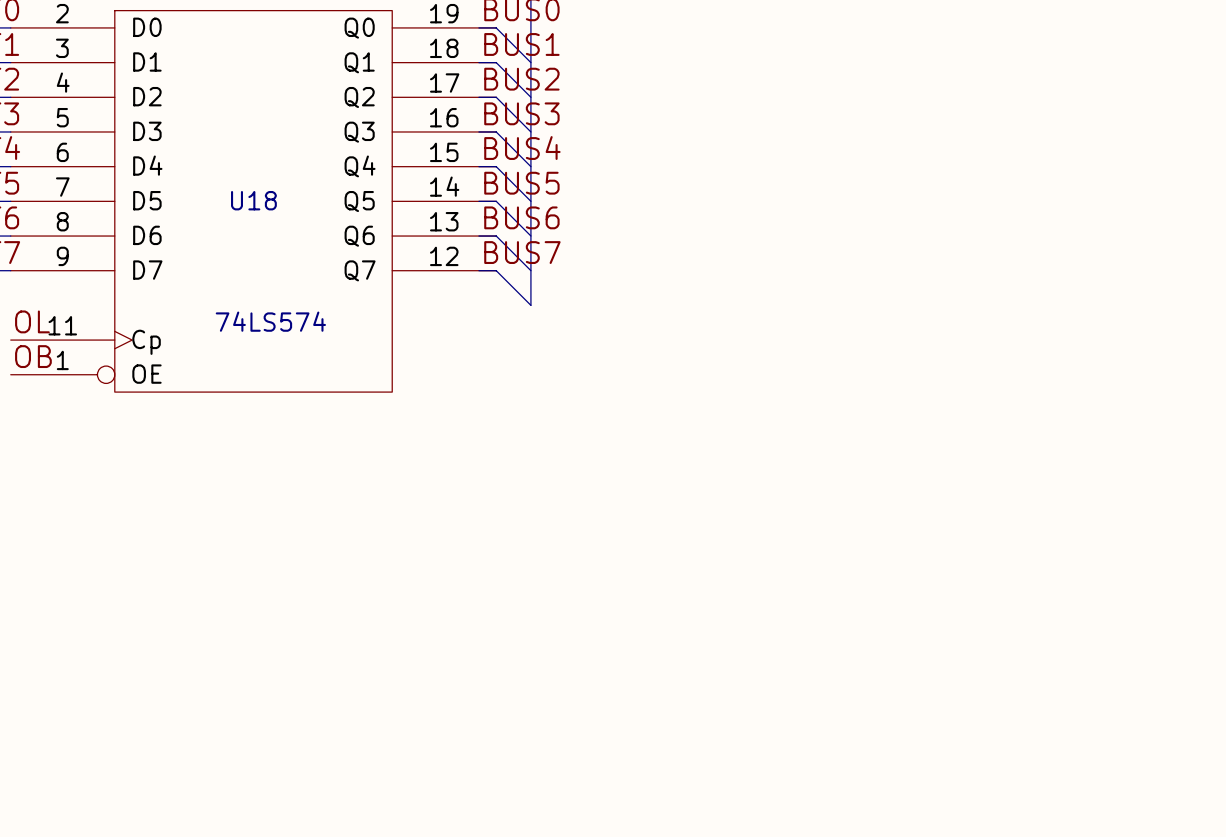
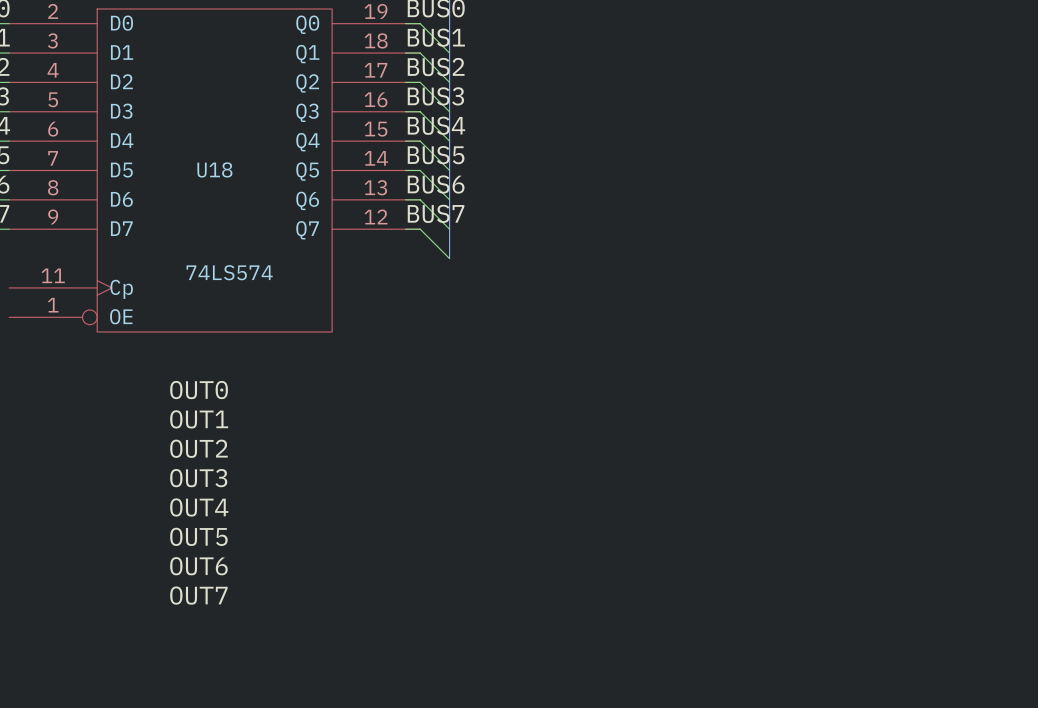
label: OL (32, 321) -> none
label: OB (33, 356) -> none
label: none -> OUT0 (199, 390)
label: none -> OUT1 (199, 419)
label: none -> OUT2 (198, 448)
label: none -> OUT3 (198, 478)
label: none -> OUT4 (199, 507)
label: none -> OUT5 (198, 536)
label: none -> OUT6 (198, 566)
label: none -> OUT7 (198, 595)

